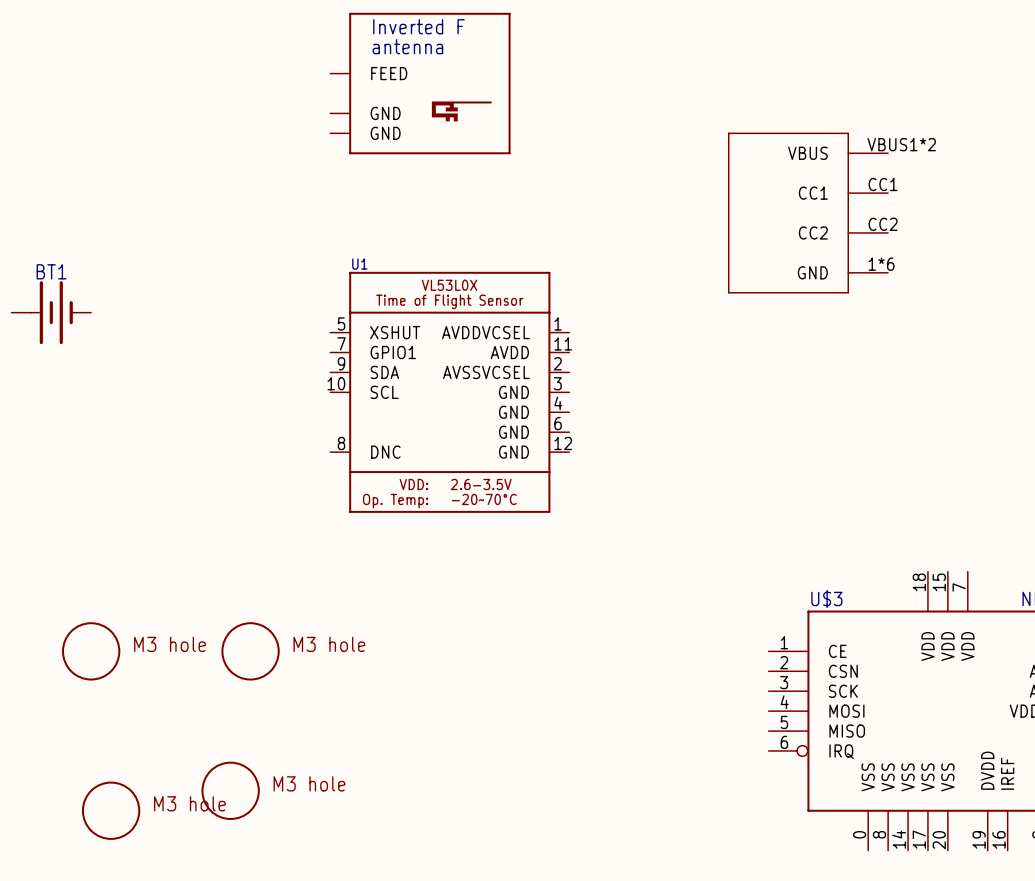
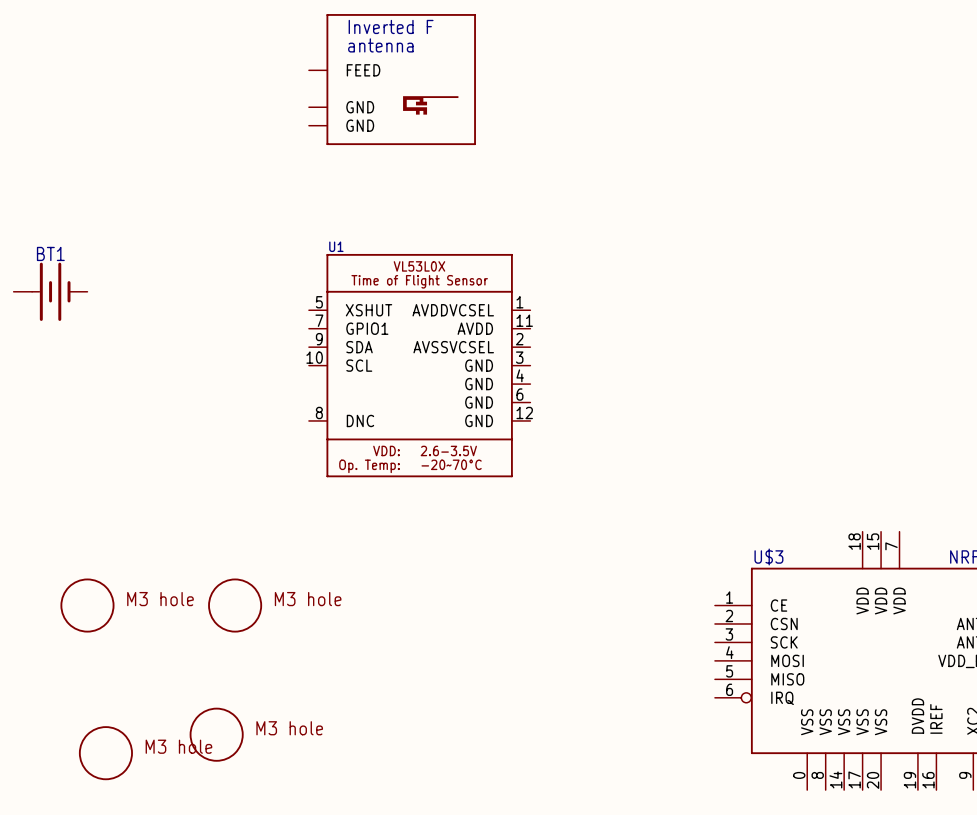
part: (808, 213) -> none

